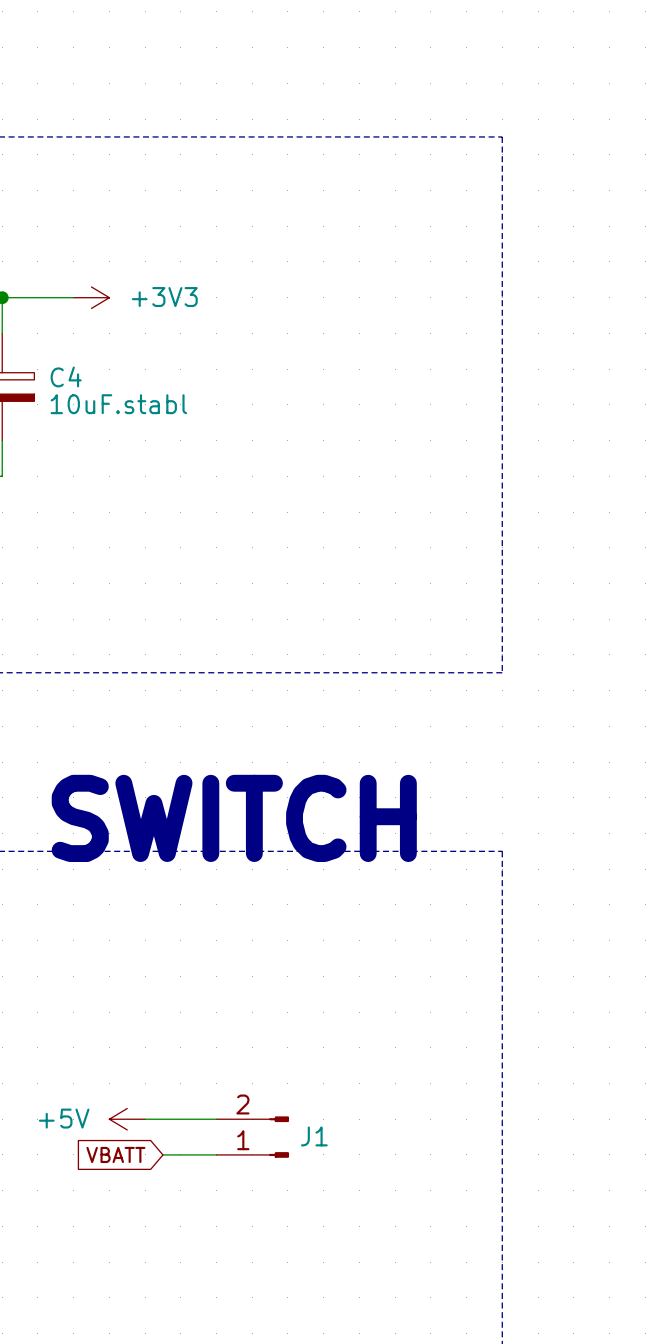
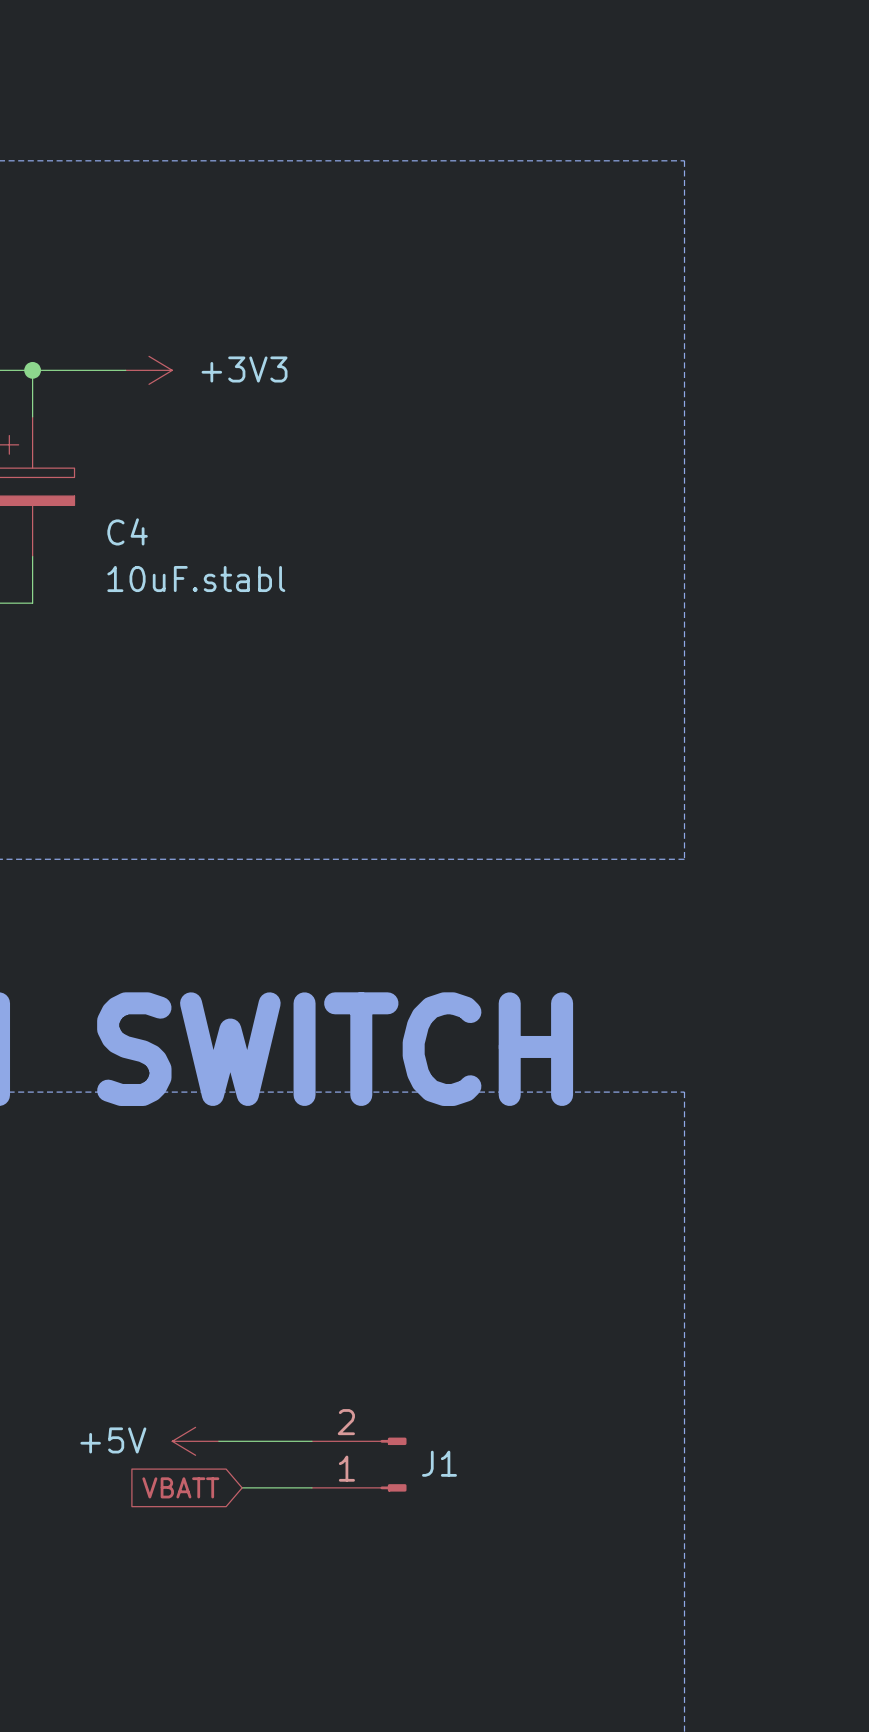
C4 name position: C4 (66, 376) -> C4 (127, 531)
C4 value position: 10uF.stabl (118, 404) -> 10uF.stabl (196, 579)

